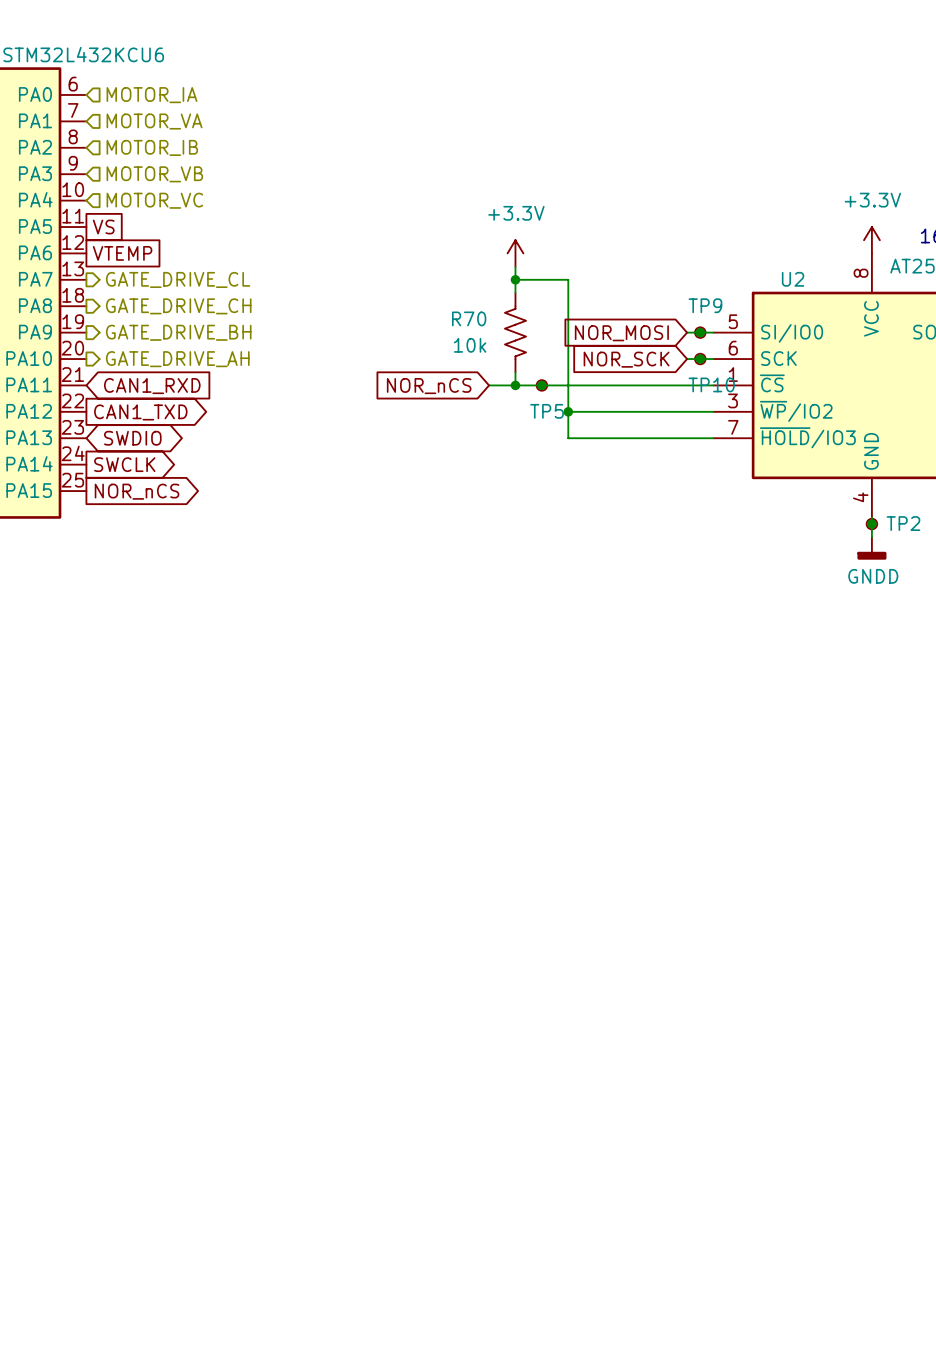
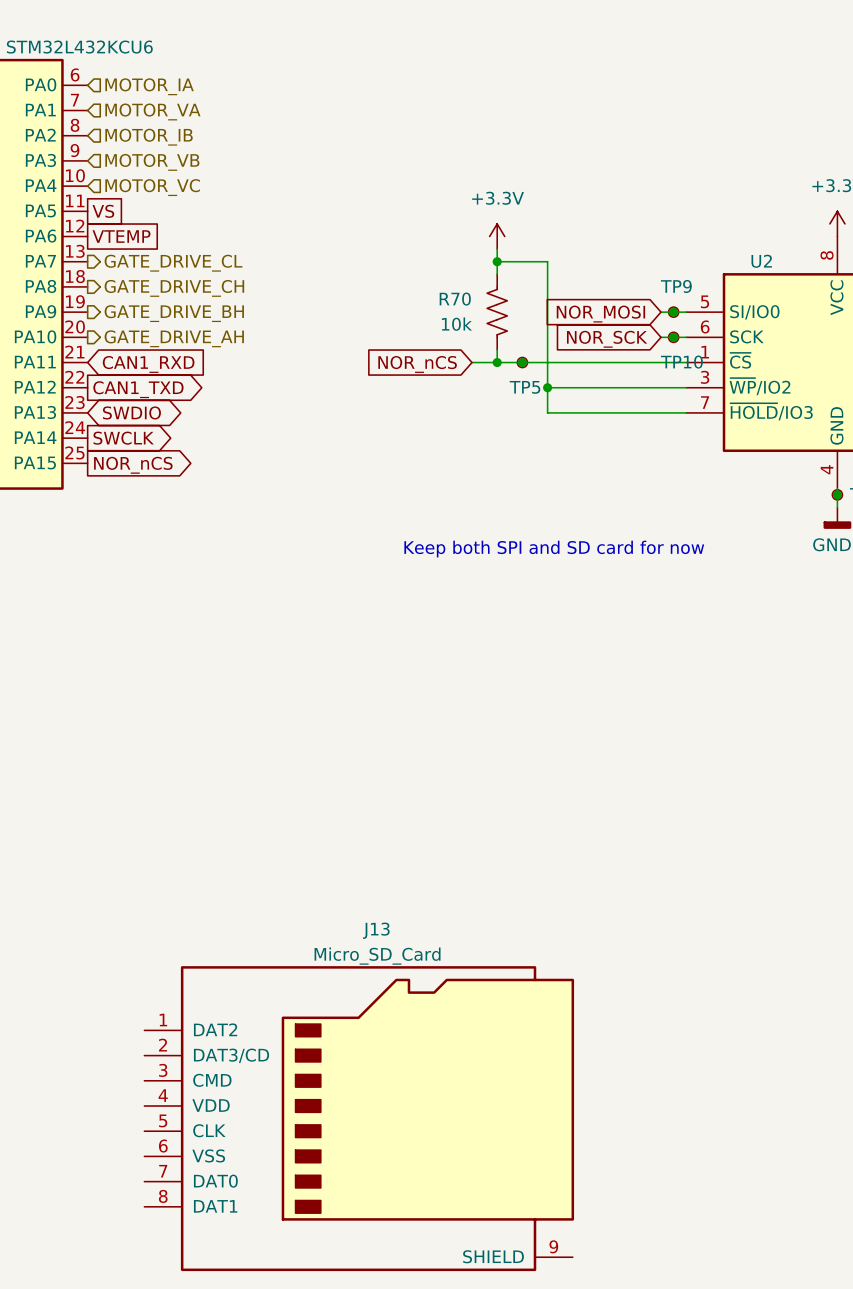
text: none -> Keep both SPI and SD card for now (554, 549)
J13: none -> Micro_SD_Card (359, 1118)

